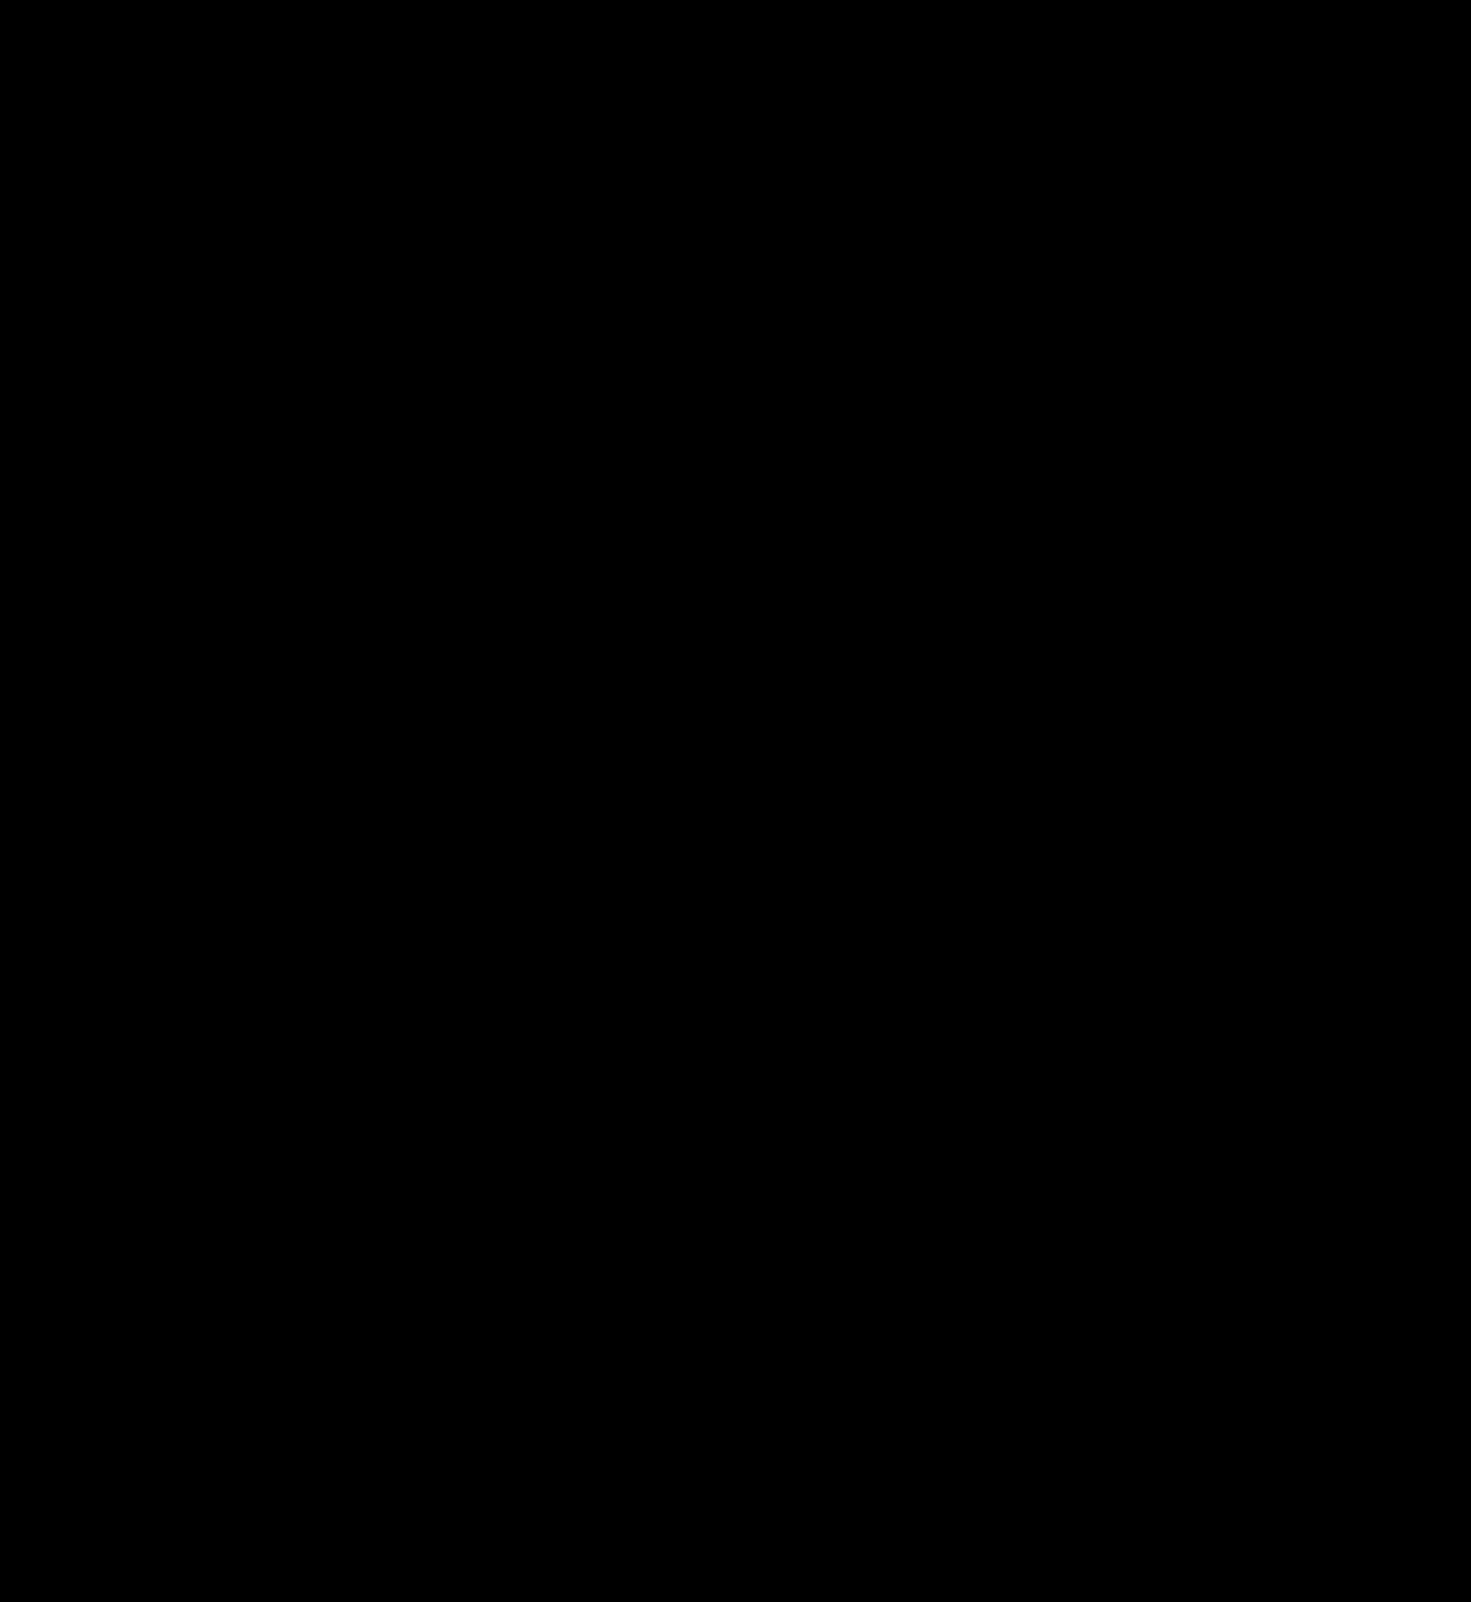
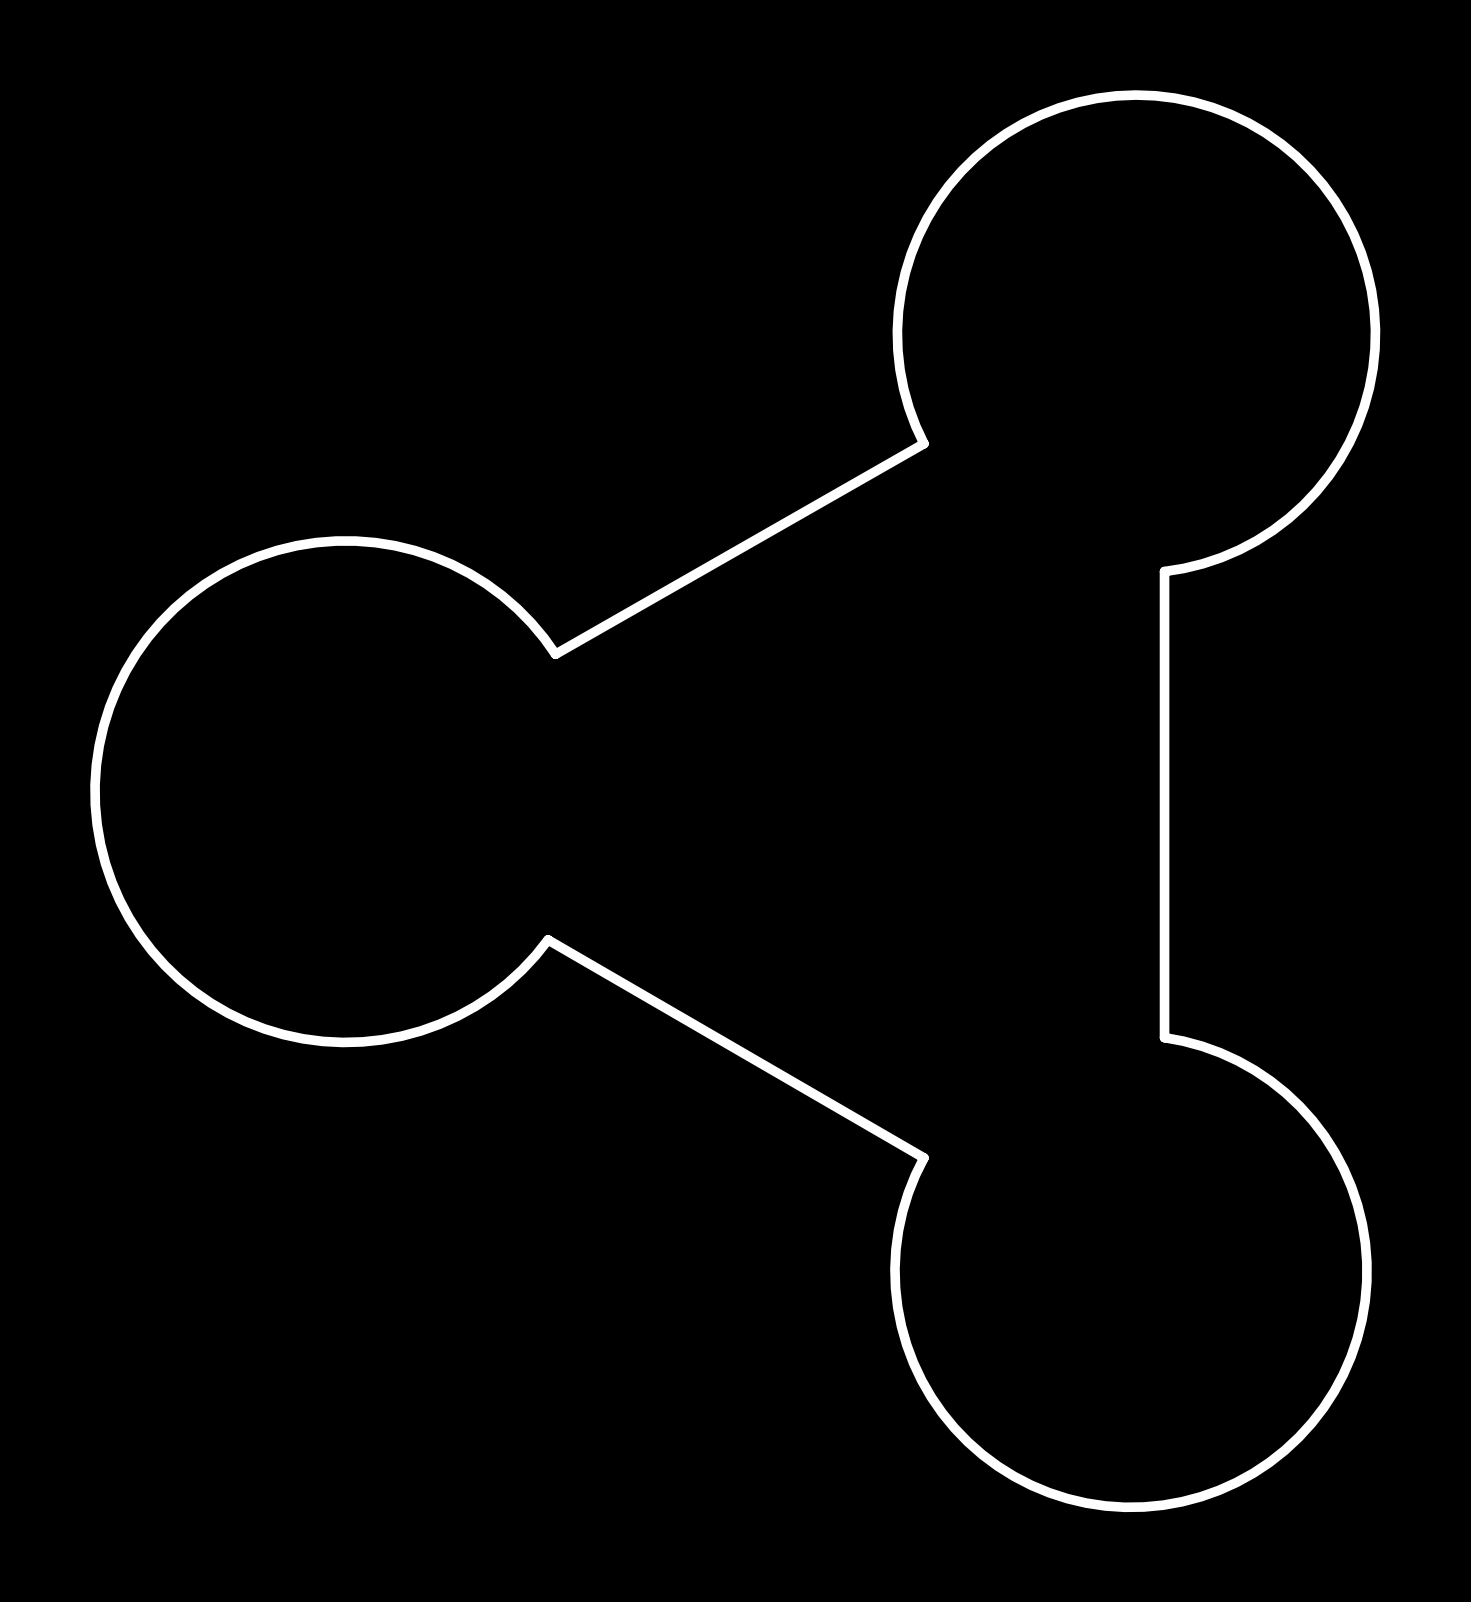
board edge: none -> (923, 443) (555, 654) (531, 622) (517, 608) (486, 583) (451, 564) (414, 550) (395, 545) (355, 541) (316, 542) (277, 550) (240, 564) (222, 573) (189, 595) (160, 622) (136, 654) (117, 688) (103, 726) (96, 765) (95, 804) (100, 844) (105, 863) (119, 900) (139, 934) (151, 950) (179, 979) (211, 1003) (228, 1013) (264, 1028) (303, 1038) (342, 1042) (382, 1039) (420, 1030) (457, 1016) (491, 995) (522, 969) (548, 939) (923, 1157) (908, 1193) (898, 1230) (894, 1268) (895, 1288) (901, 1326) (913, 1362) (921, 1380) (942, 1413) (954, 1428) (982, 1454) (1014, 1476) (1049, 1492) (1086, 1503) (1105, 1505) (1143, 1507) (1182, 1501) (1218, 1490) (1253, 1473) (1284, 1450) (1311, 1423) (1334, 1391) (1350, 1356) (1361, 1319) (1365, 1300) (1366, 1281) (1365, 1243) (1357, 1205) (1351, 1187) (1334, 1152) (1312, 1120) (1299, 1106) (1270, 1081) (1237, 1060) (1202, 1046) (1164, 1037) (1164, 571) (1202, 563) (1221, 557) (1239, 549) (1273, 530) (1288, 518) (1316, 491) (1339, 459) (1349, 442) (1357, 424) (1369, 387) (1375, 349) (1375, 329) (1374, 310) (1367, 271) (1353, 234) (1345, 217) (1323, 185) (1296, 156) (1265, 132) (1248, 122) (1212, 107) (1174, 98) (1135, 95) (1116, 95) (1096, 98) (1059, 107) (1023, 123) (990, 144) (961, 171) (948, 185) (927, 218) (911, 254) (905, 272) (898, 311) (897, 350) (903, 388) (915, 426) (923, 443)

